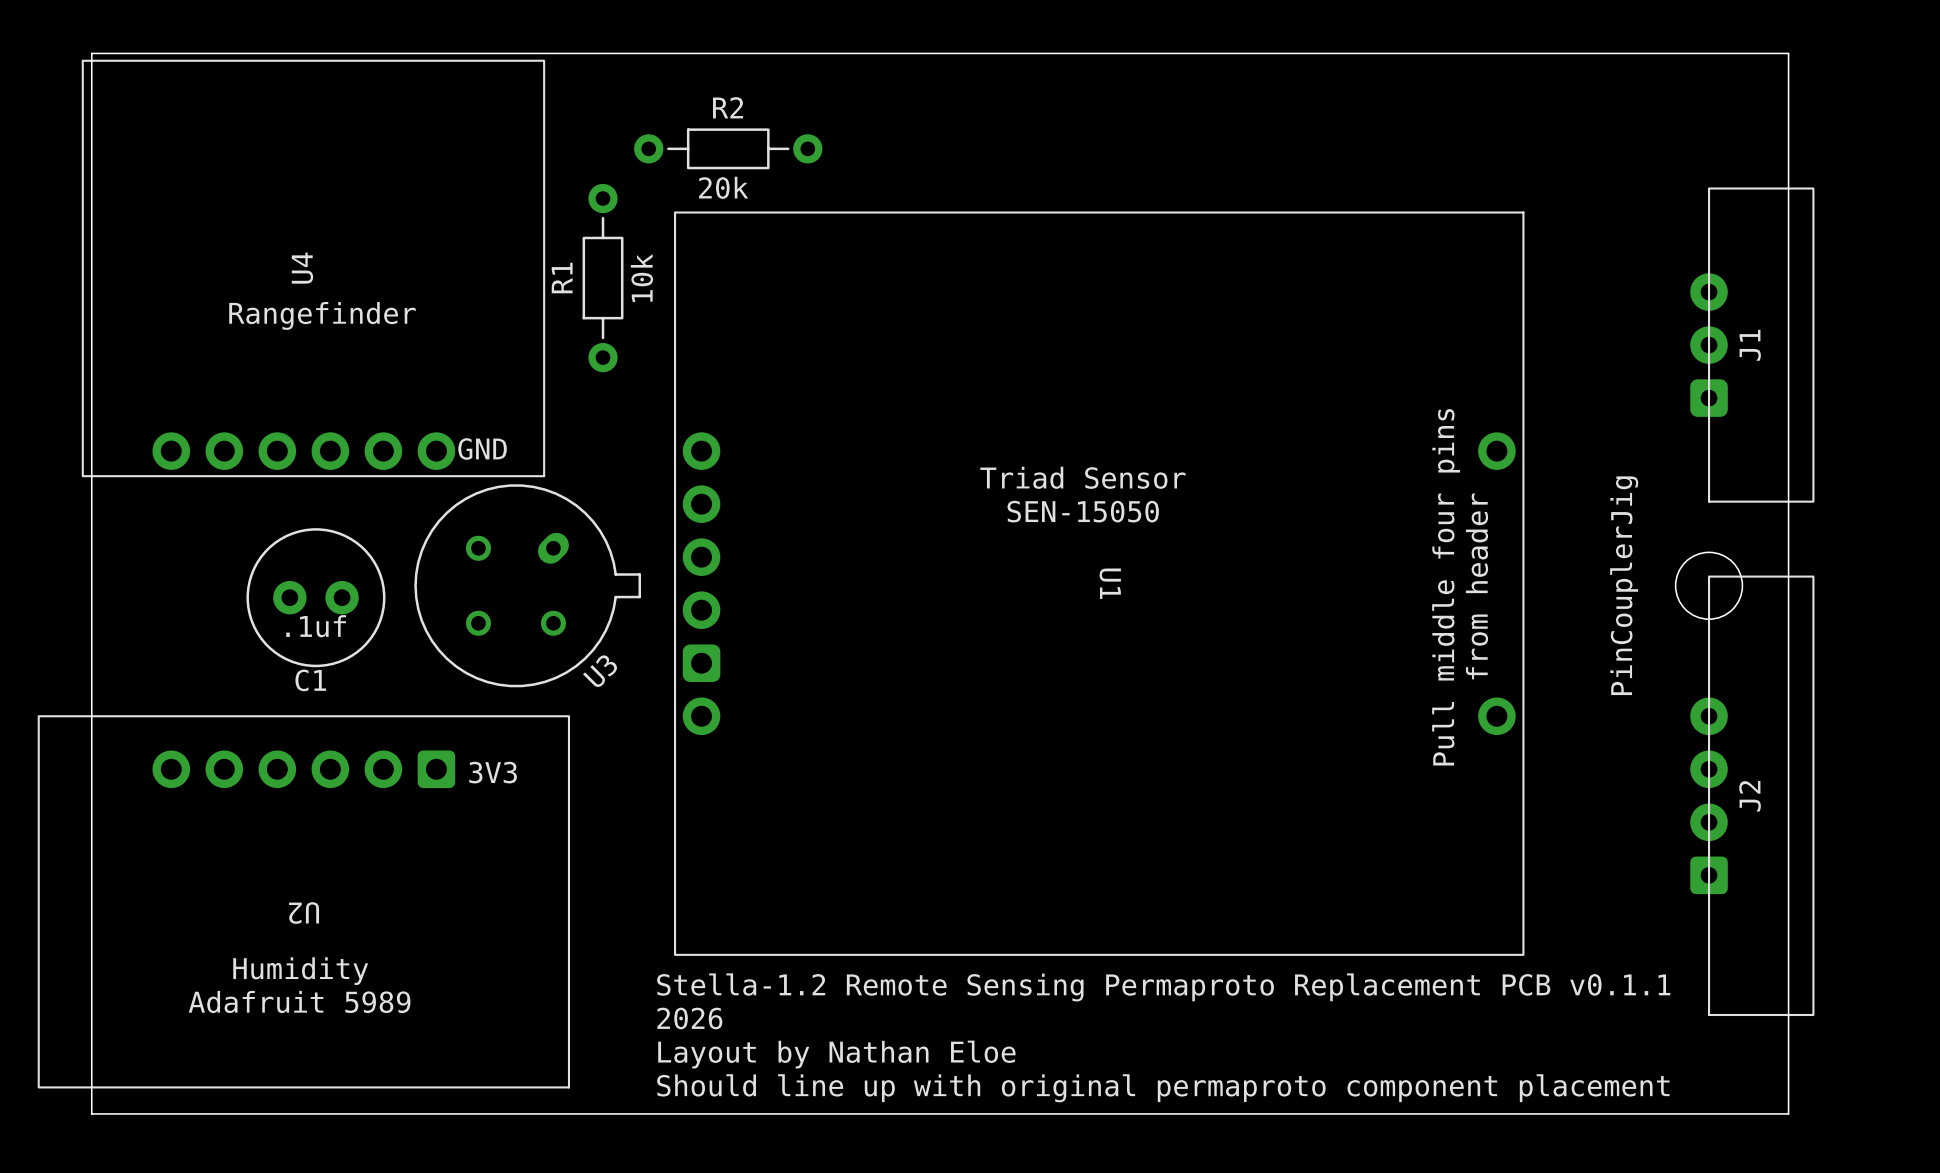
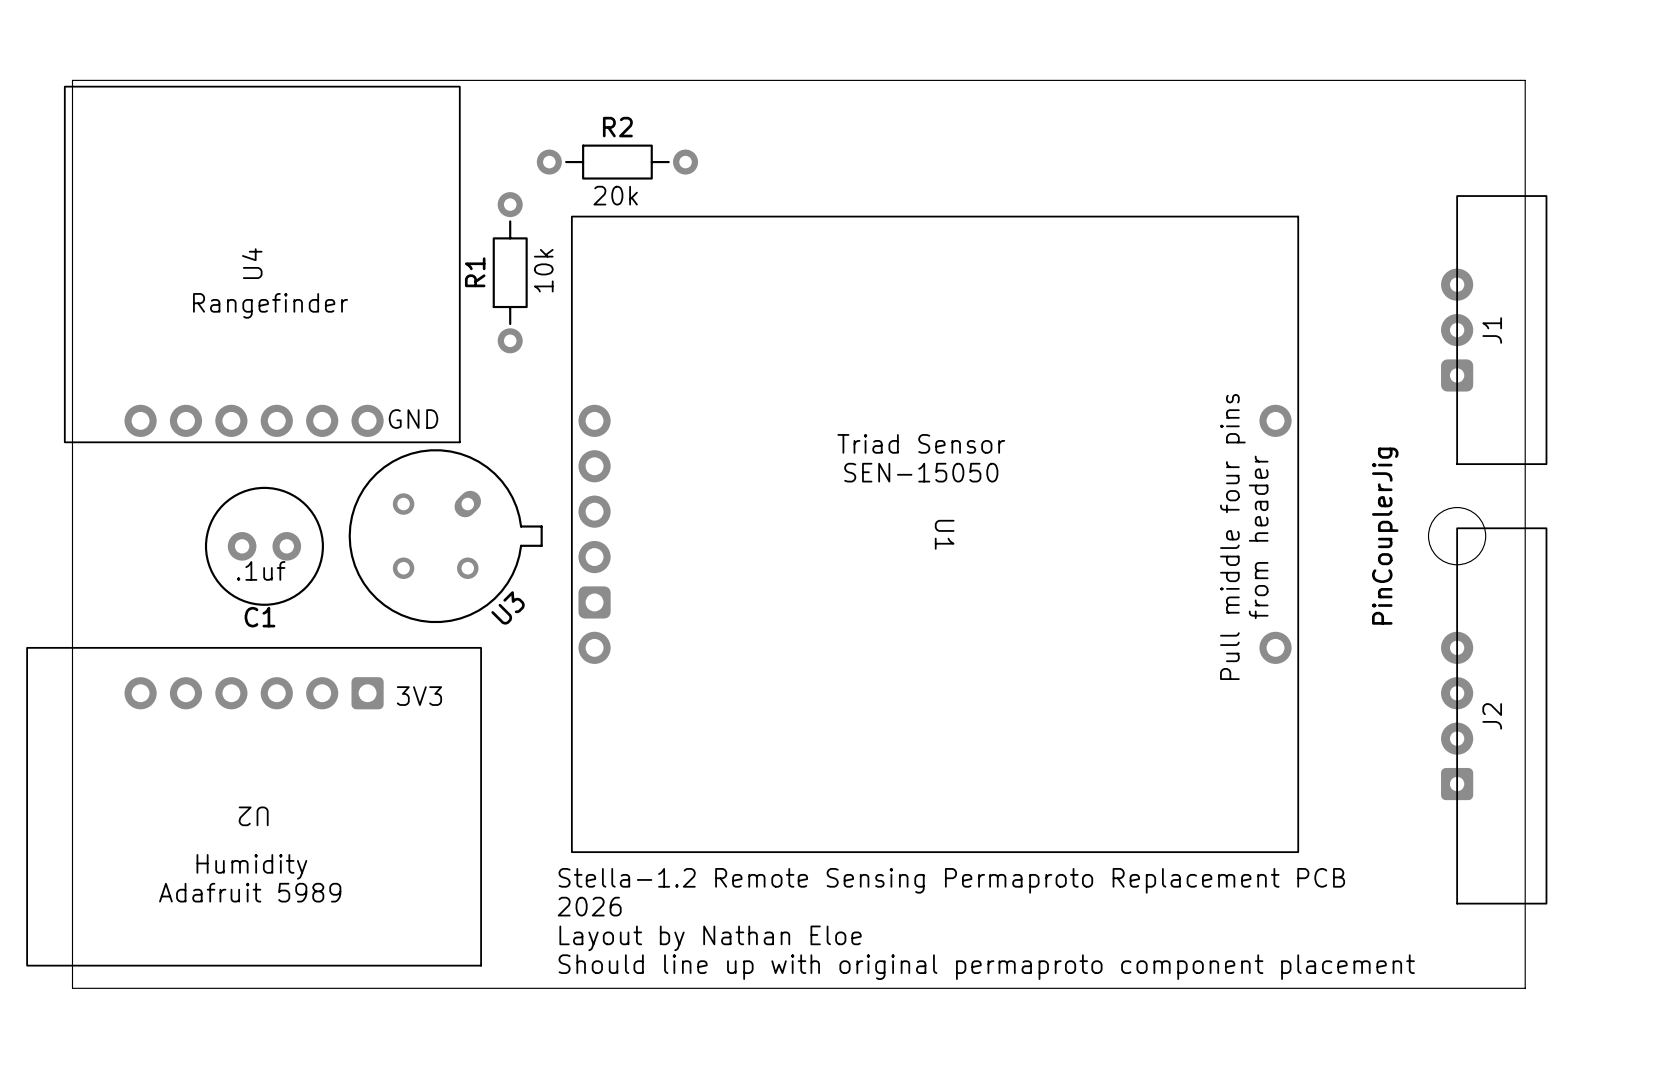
text: Stella-1.2 Remote Sensing Permaproto Replacement PCB v0.1.1 (1163, 987) -> Stella-1.2 Remote Sensing Permaproto Replacement PCB (951, 880)

